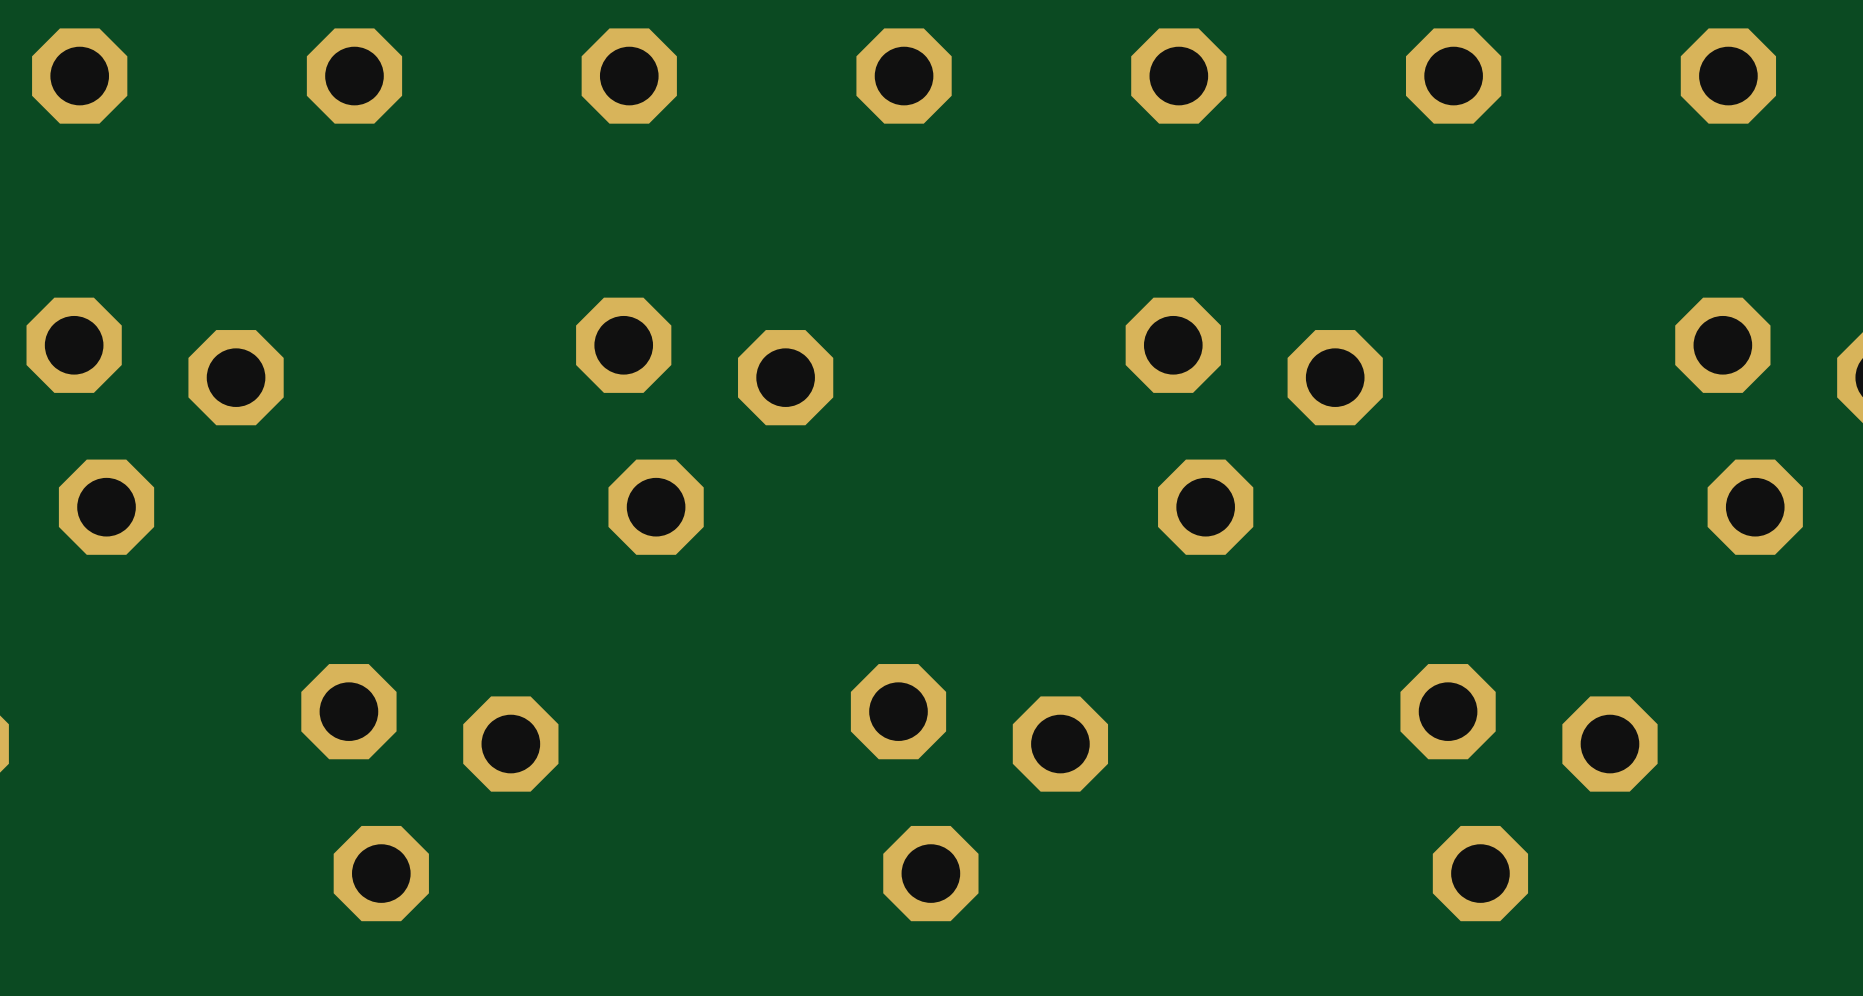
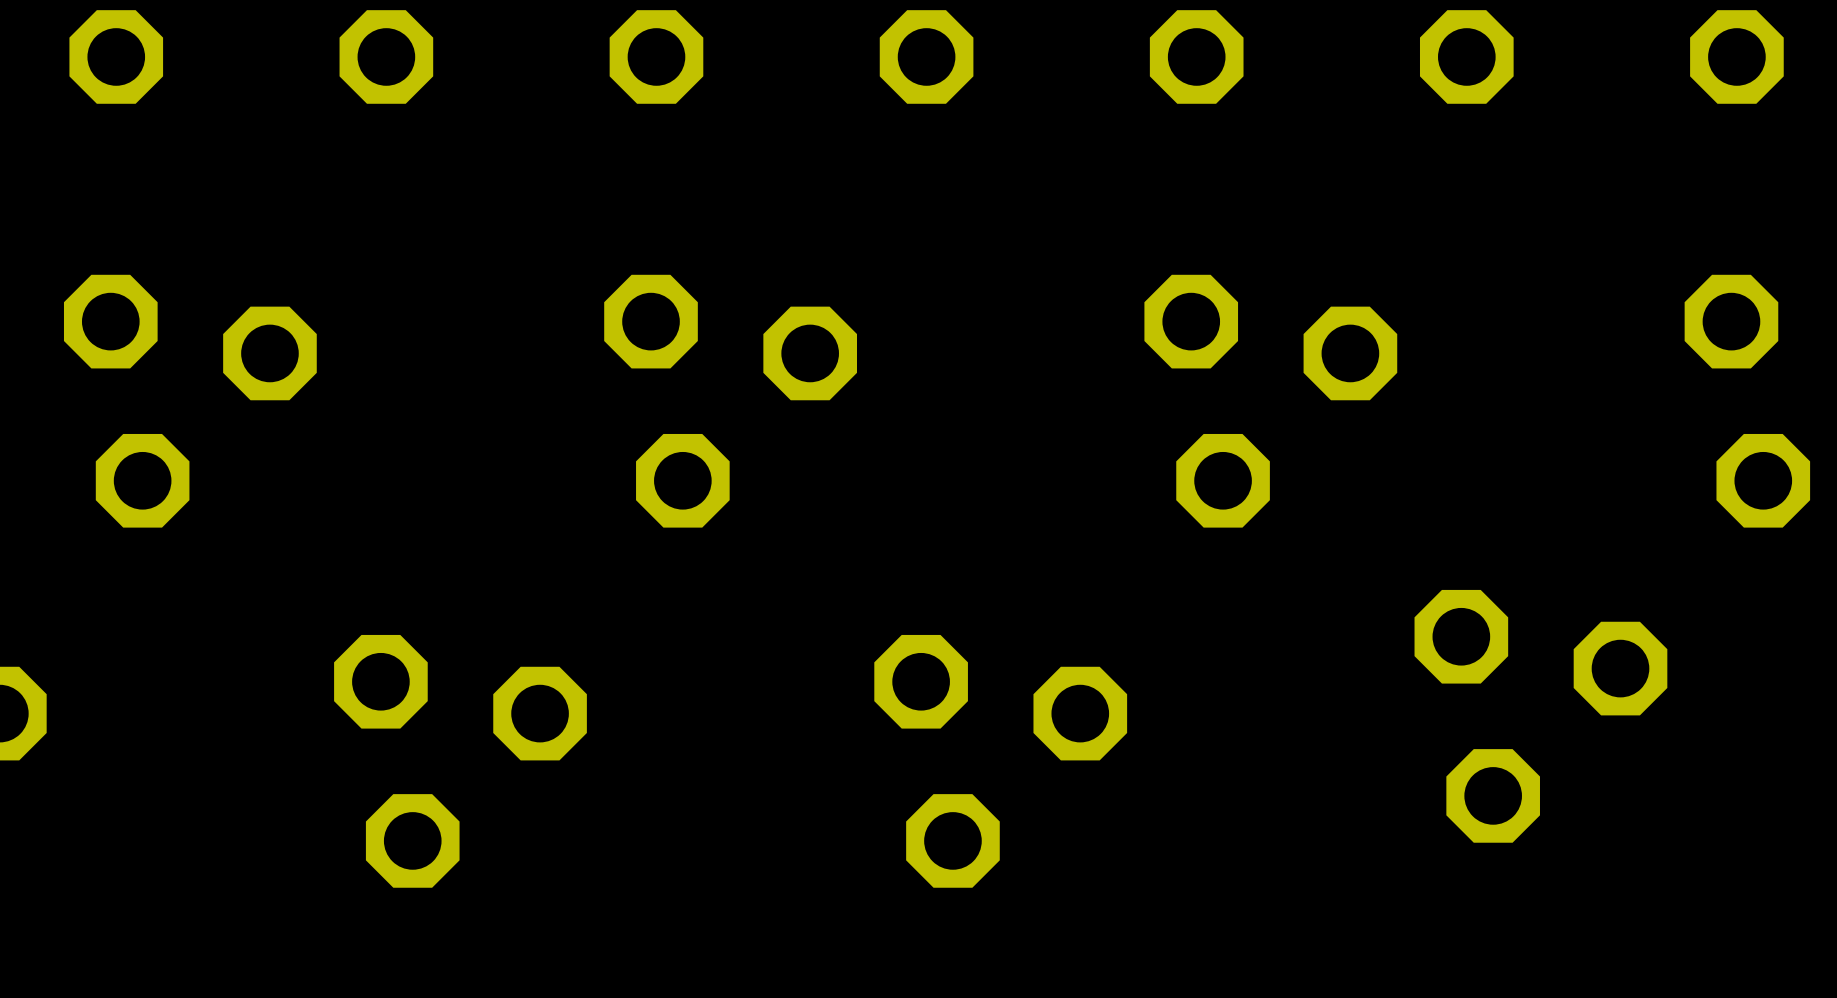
part position: (1529, 792) -> (1540, 716)

